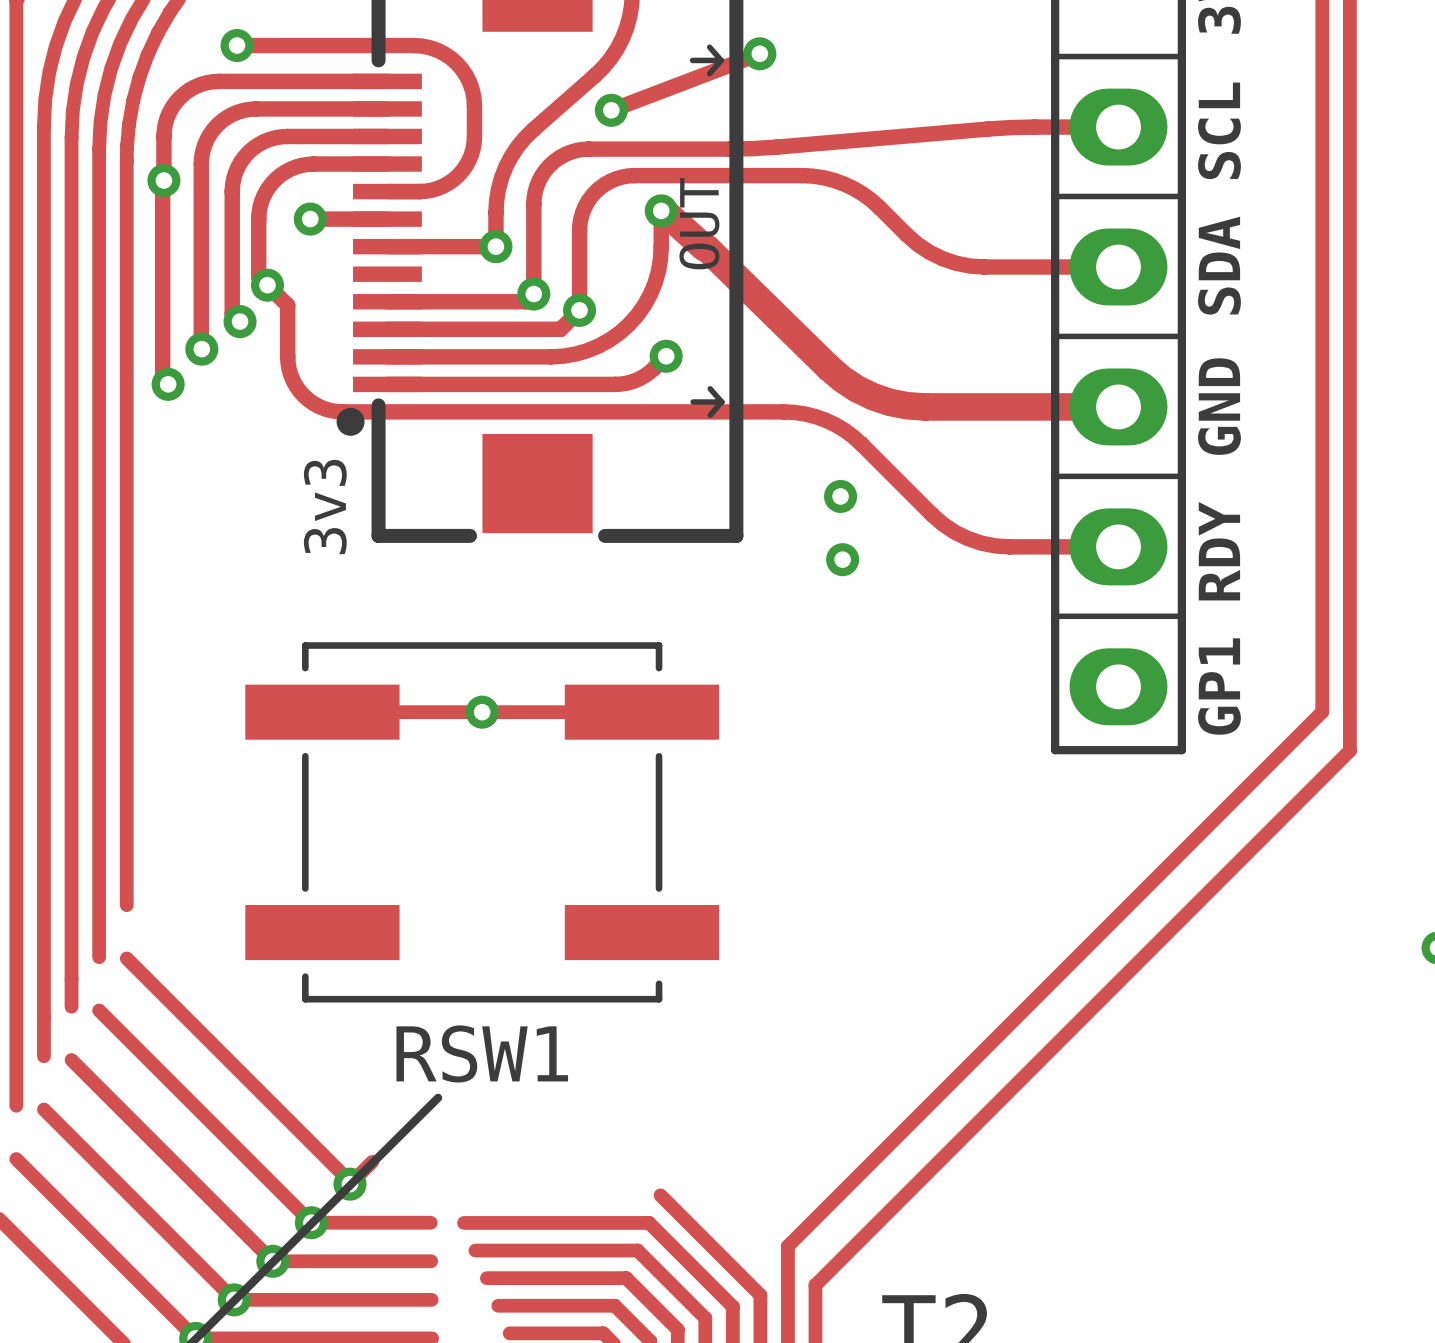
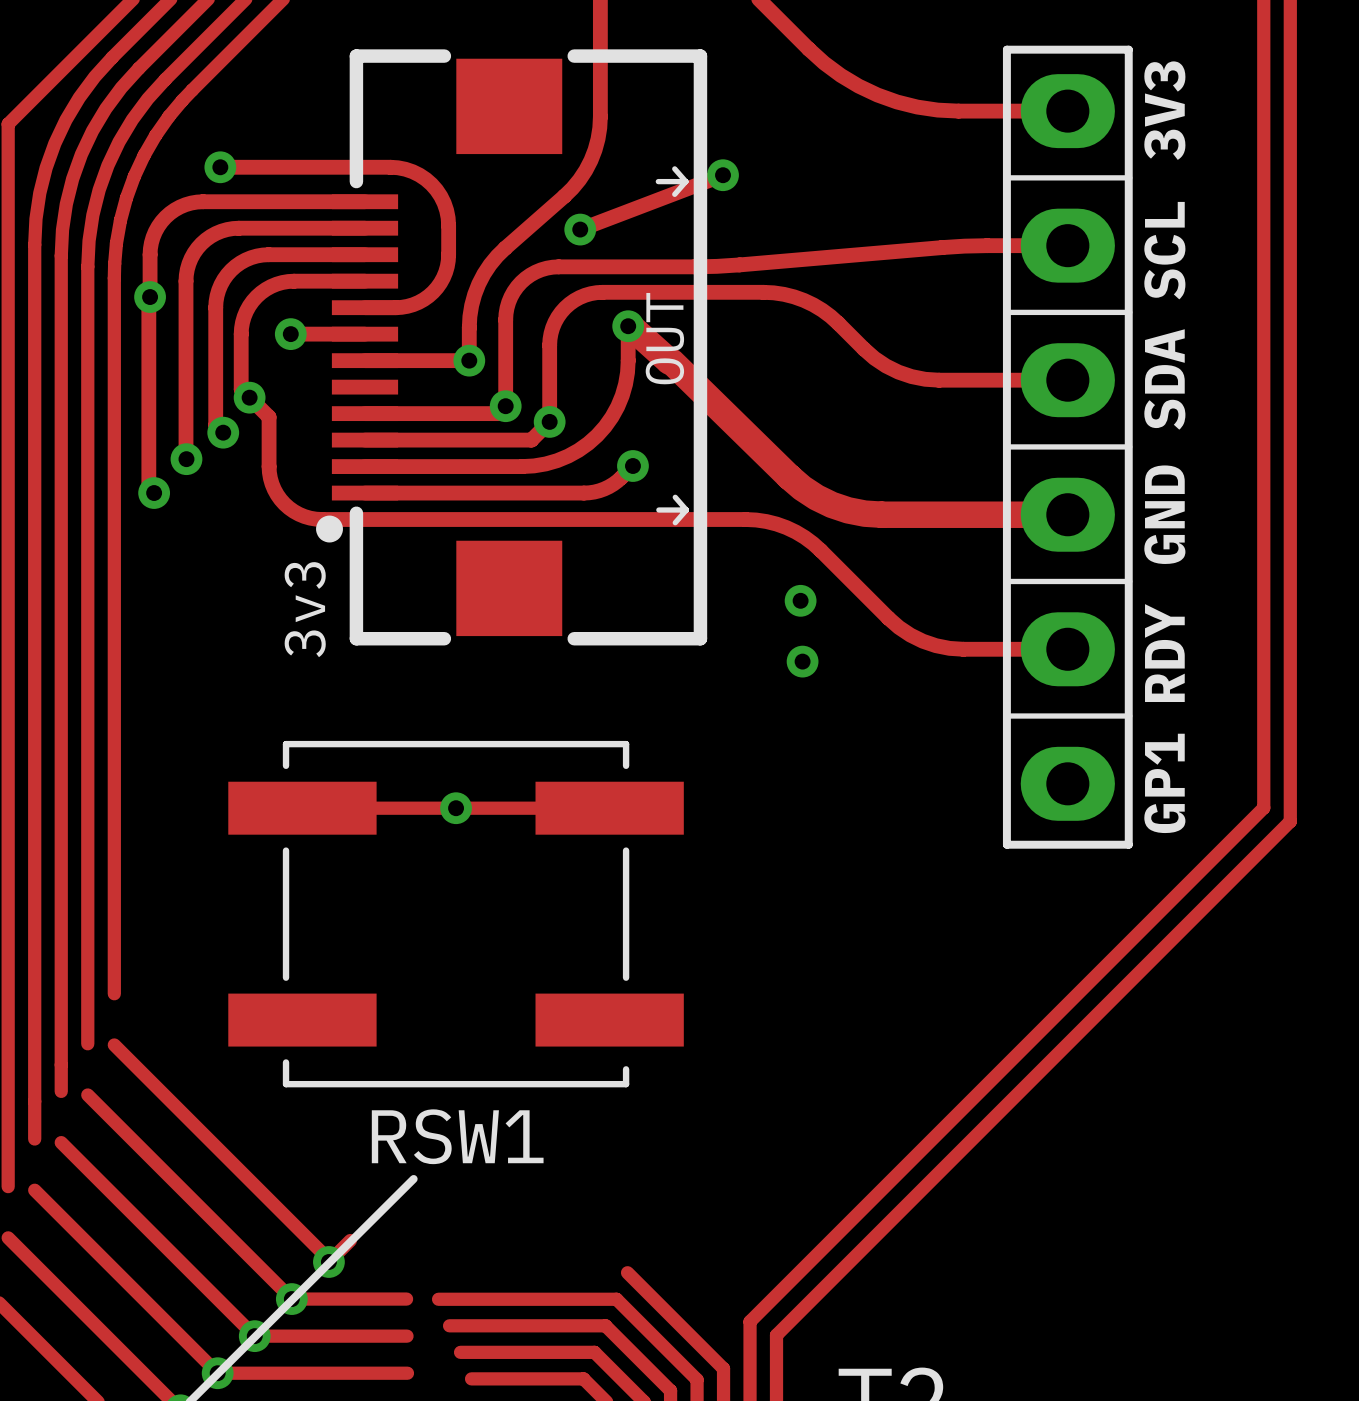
track: (1349, 725) (1349, 750) (815, 1285) -> (1290, 821) (776, 1335) (776, 1359)

